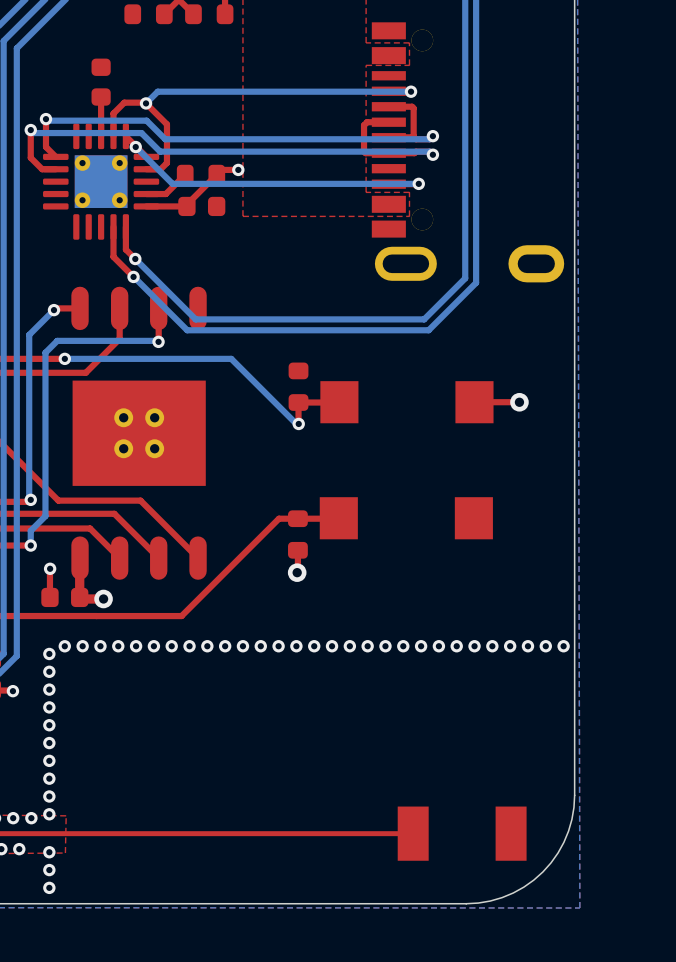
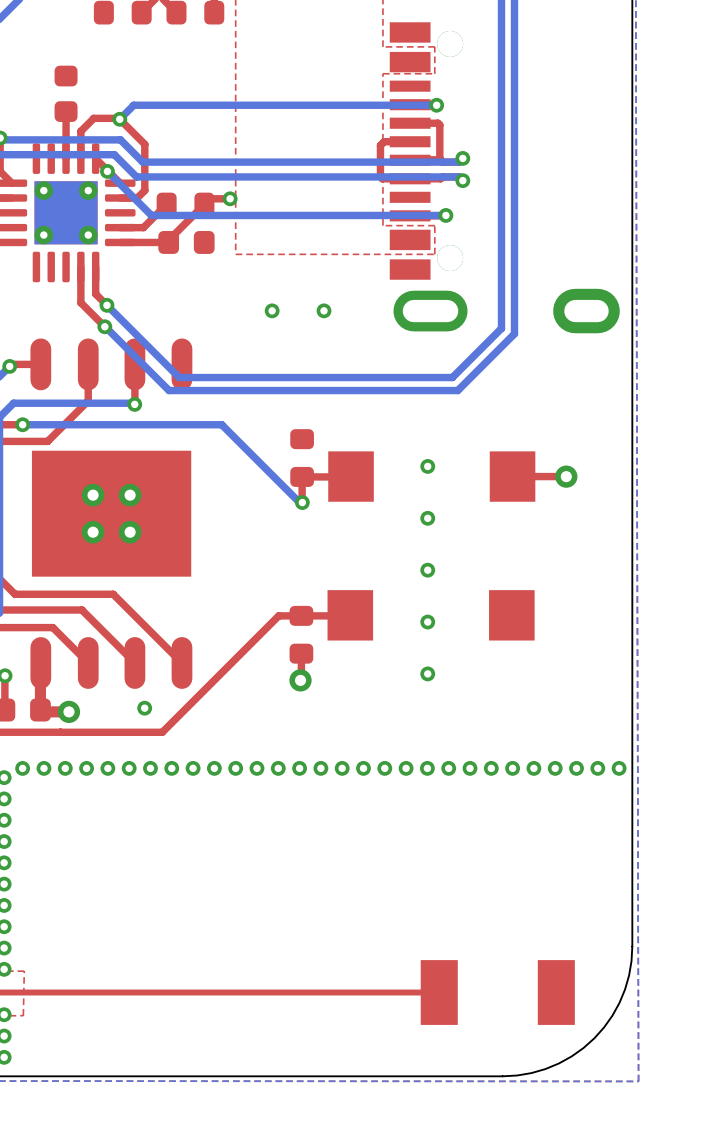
via: none -> (272, 310)
via: none -> (324, 310)
via: none -> (427, 466)
via: none -> (427, 518)
via: none -> (427, 570)
via: none -> (427, 622)
via: none -> (427, 673)
via: none -> (144, 708)

